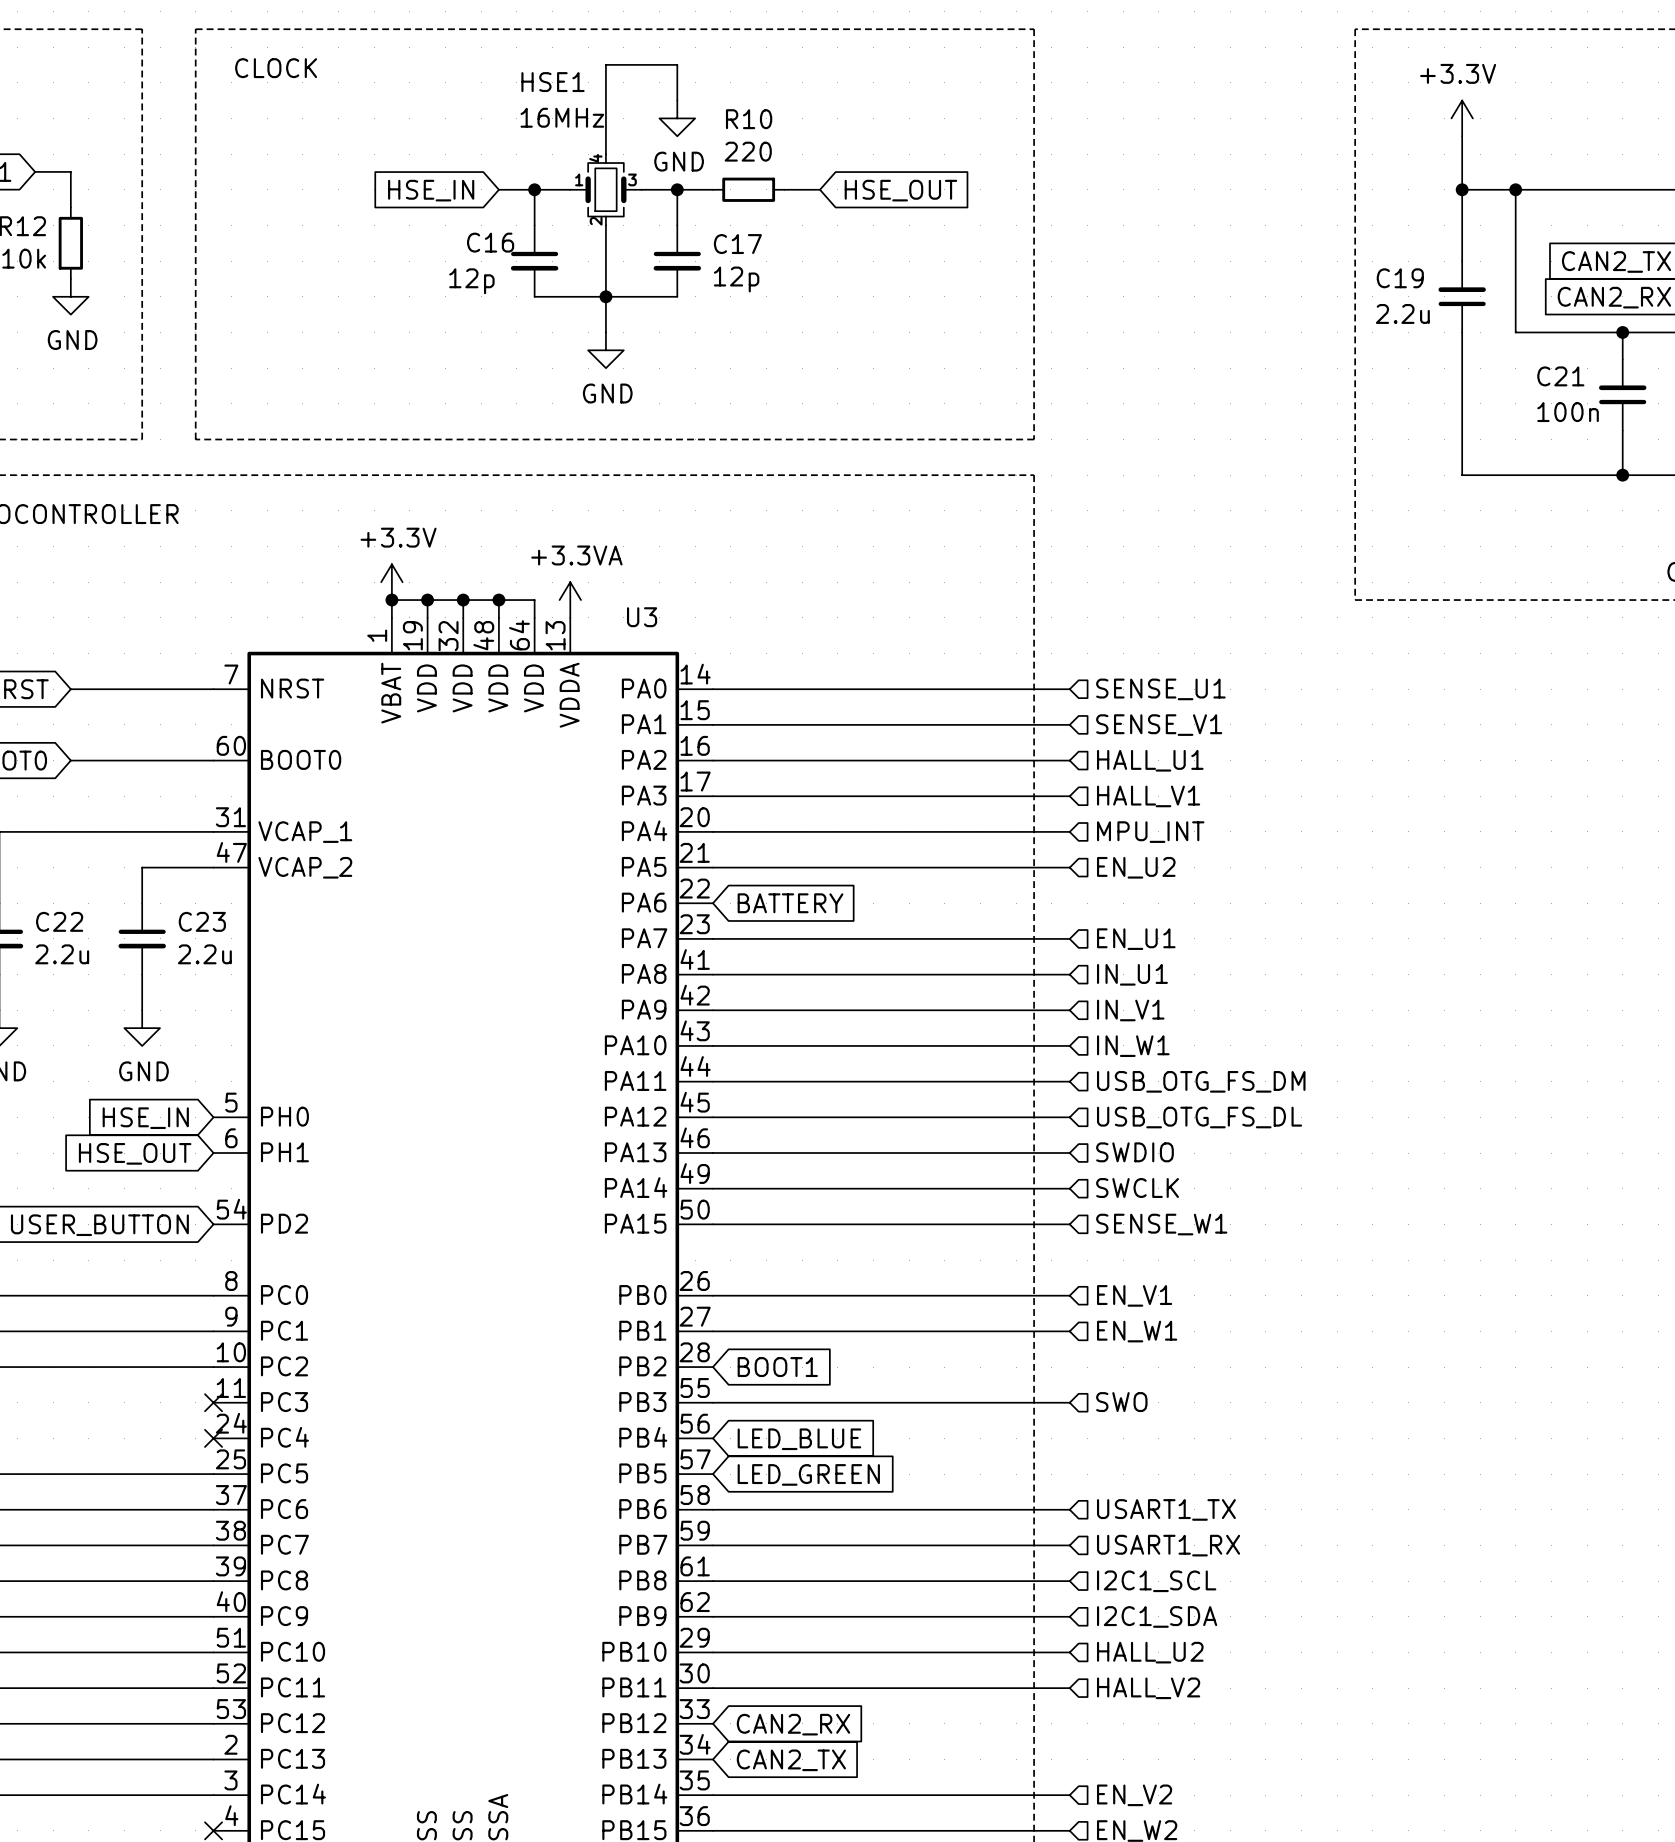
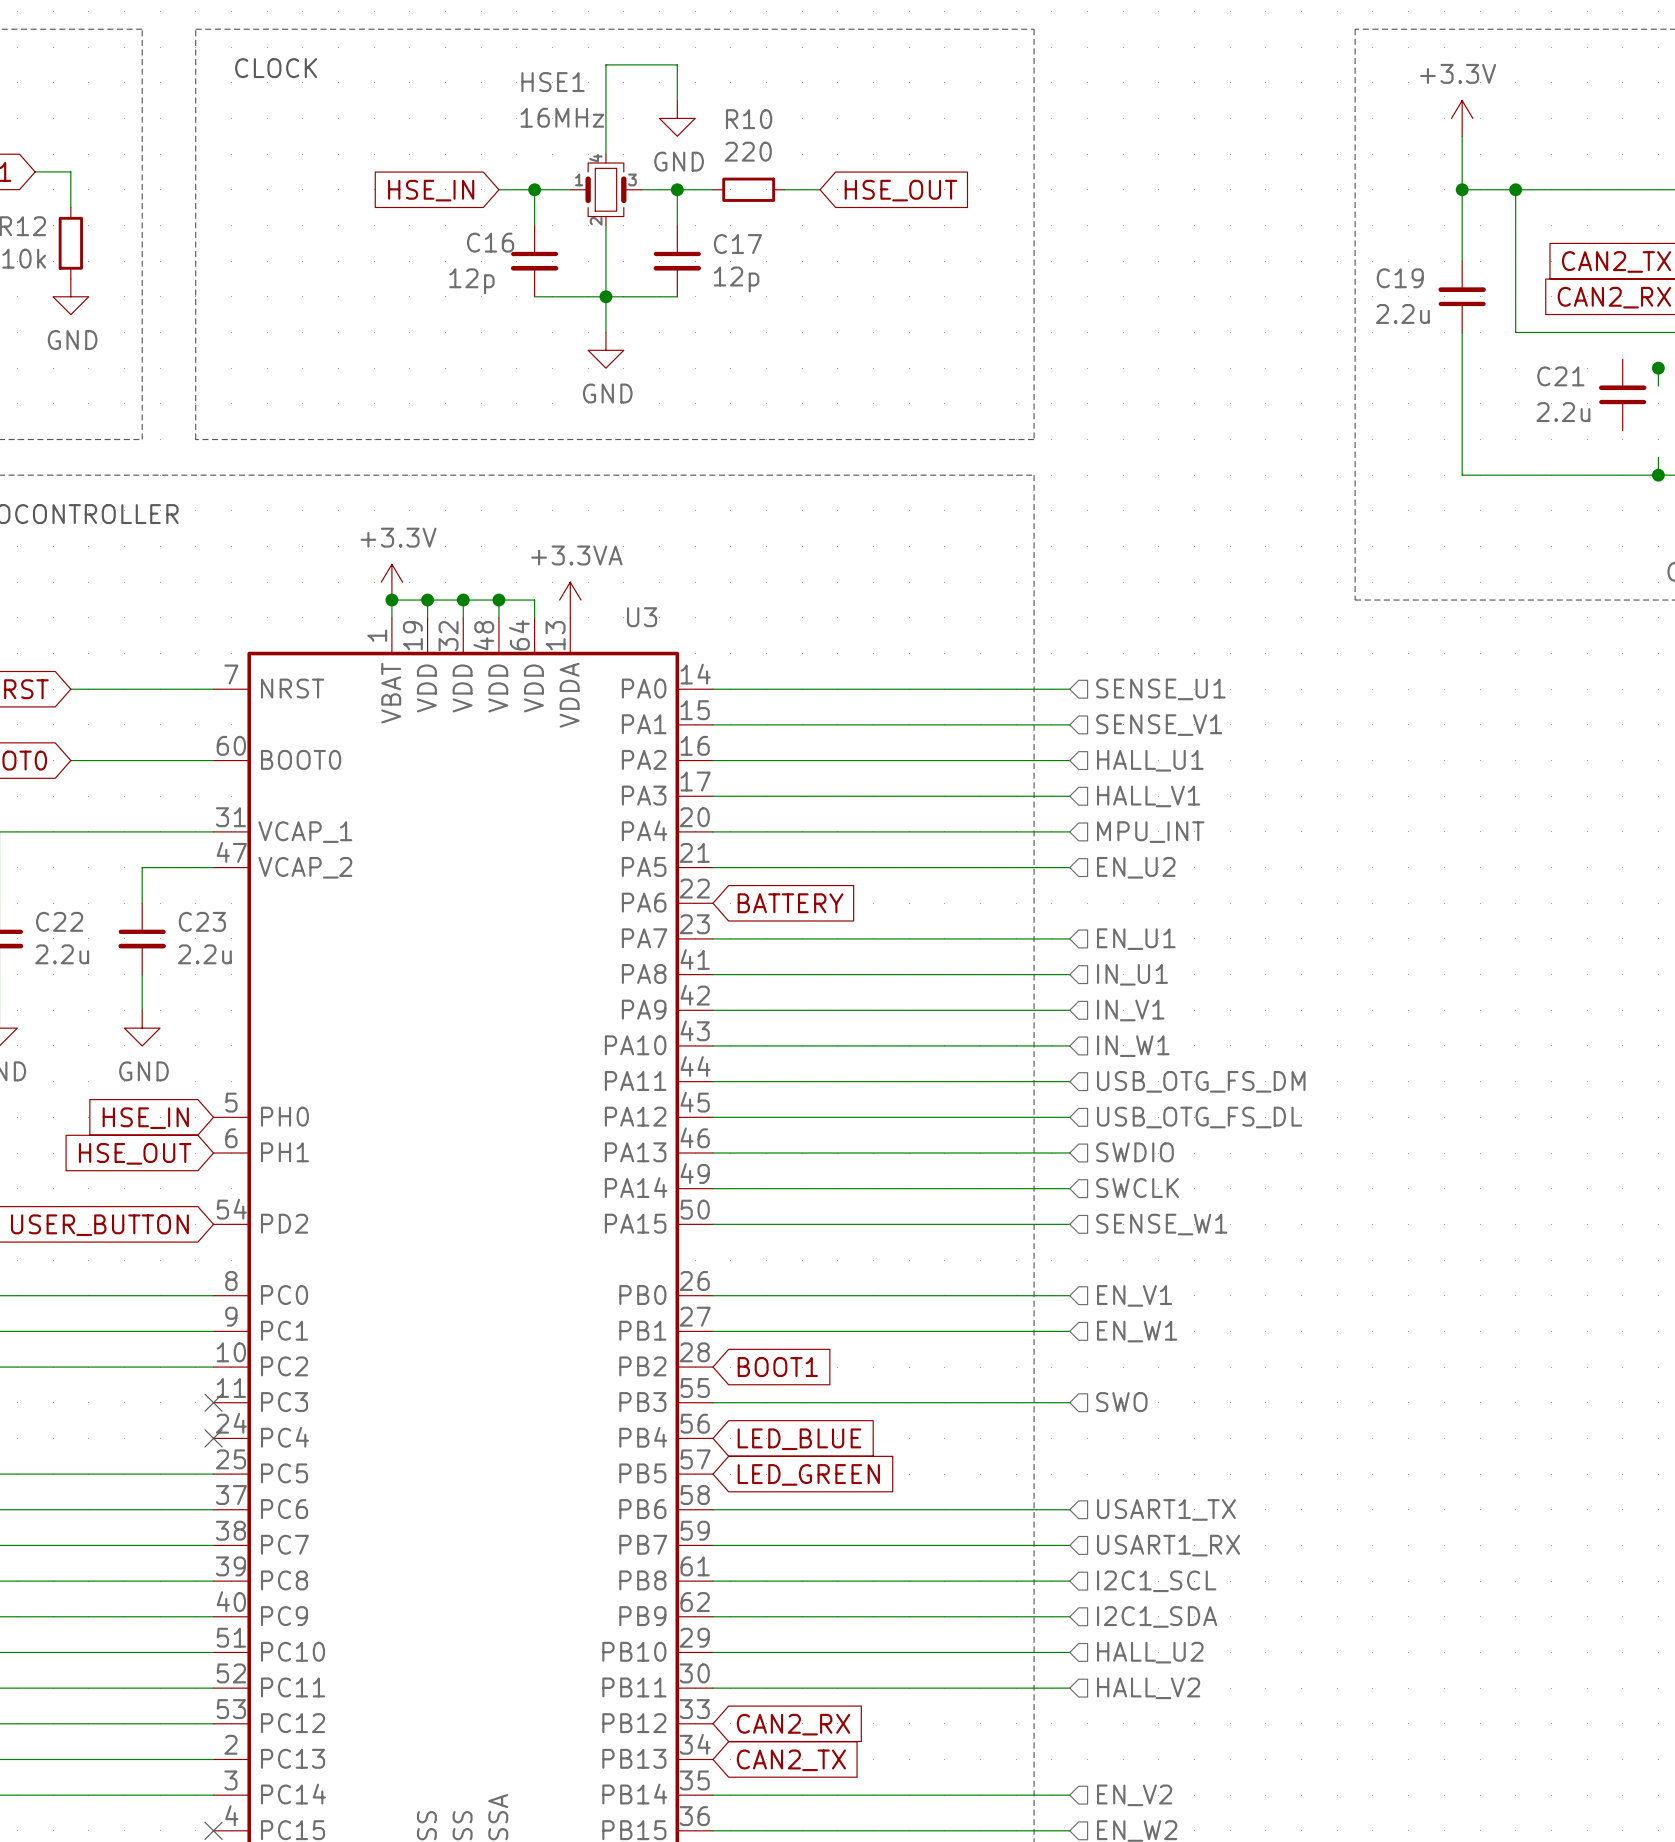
wire: (1622, 332) (1622, 359) -> none
junction position: (1622, 332) -> (1658, 368)
wire: none -> (1658, 368) (1658, 385)
C21 value: 100n (1568, 412) -> 2.2u (1563, 412)
wire: (1622, 430) (1622, 475) -> none
wire: none -> (1658, 457) (1658, 475)
junction position: (1622, 475) -> (1658, 475)

